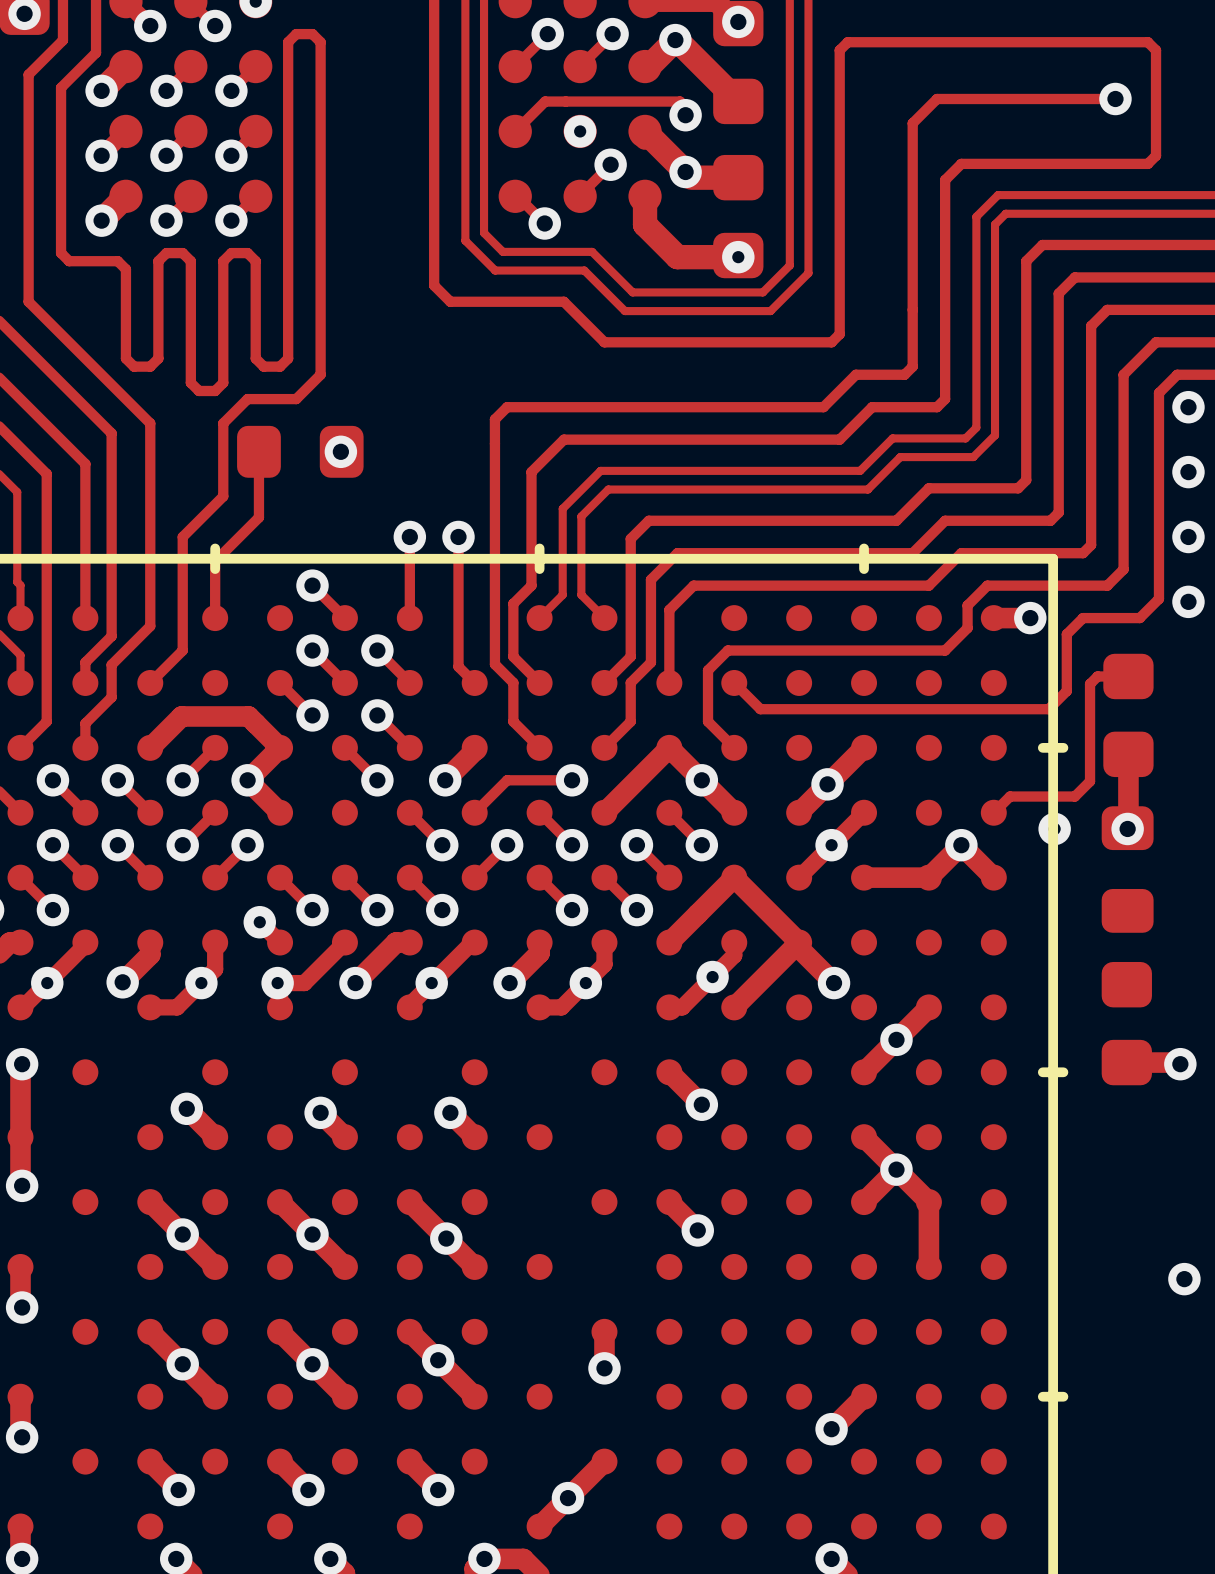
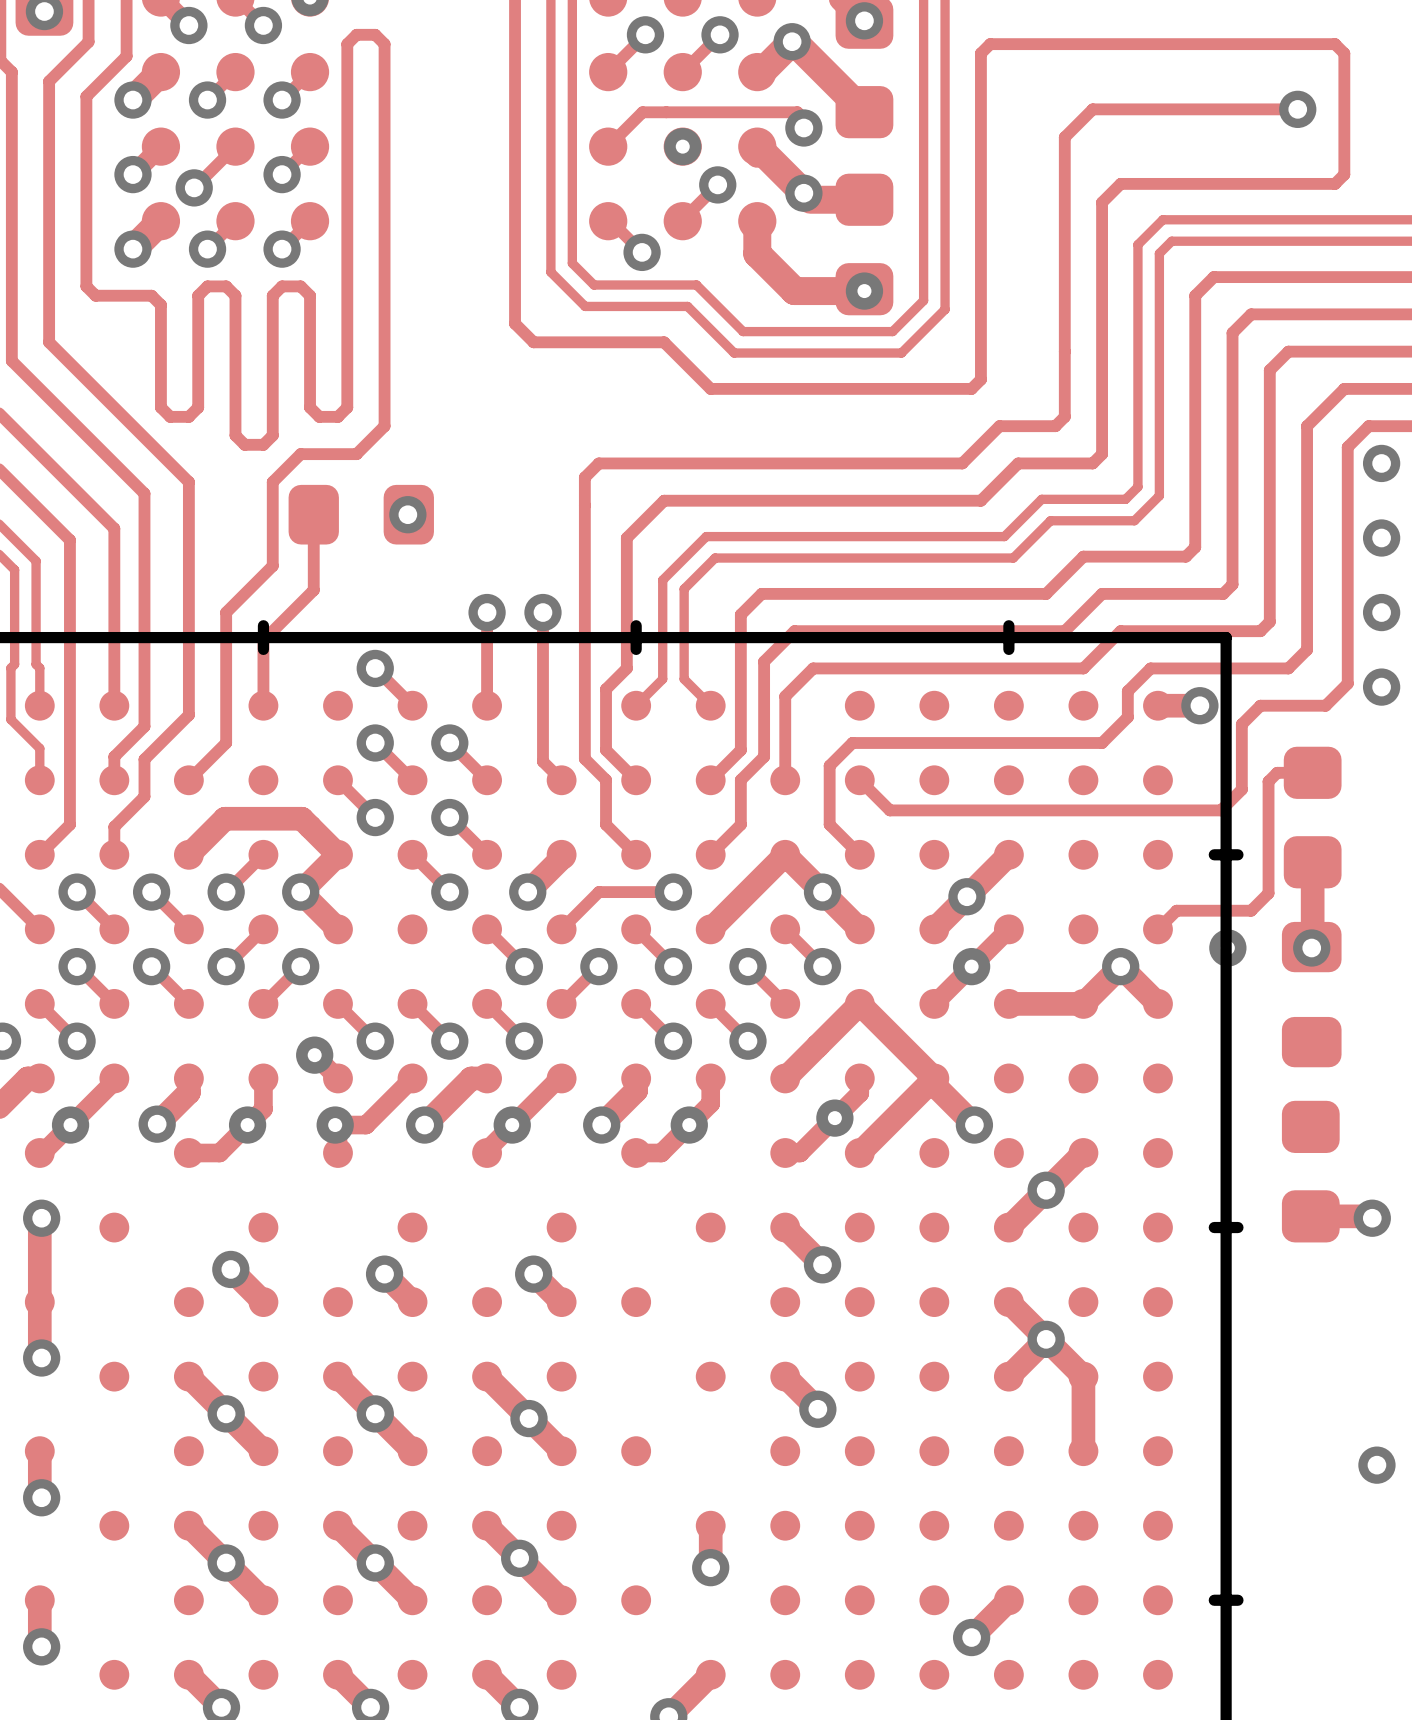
via position: (166, 155) -> (194, 187)

